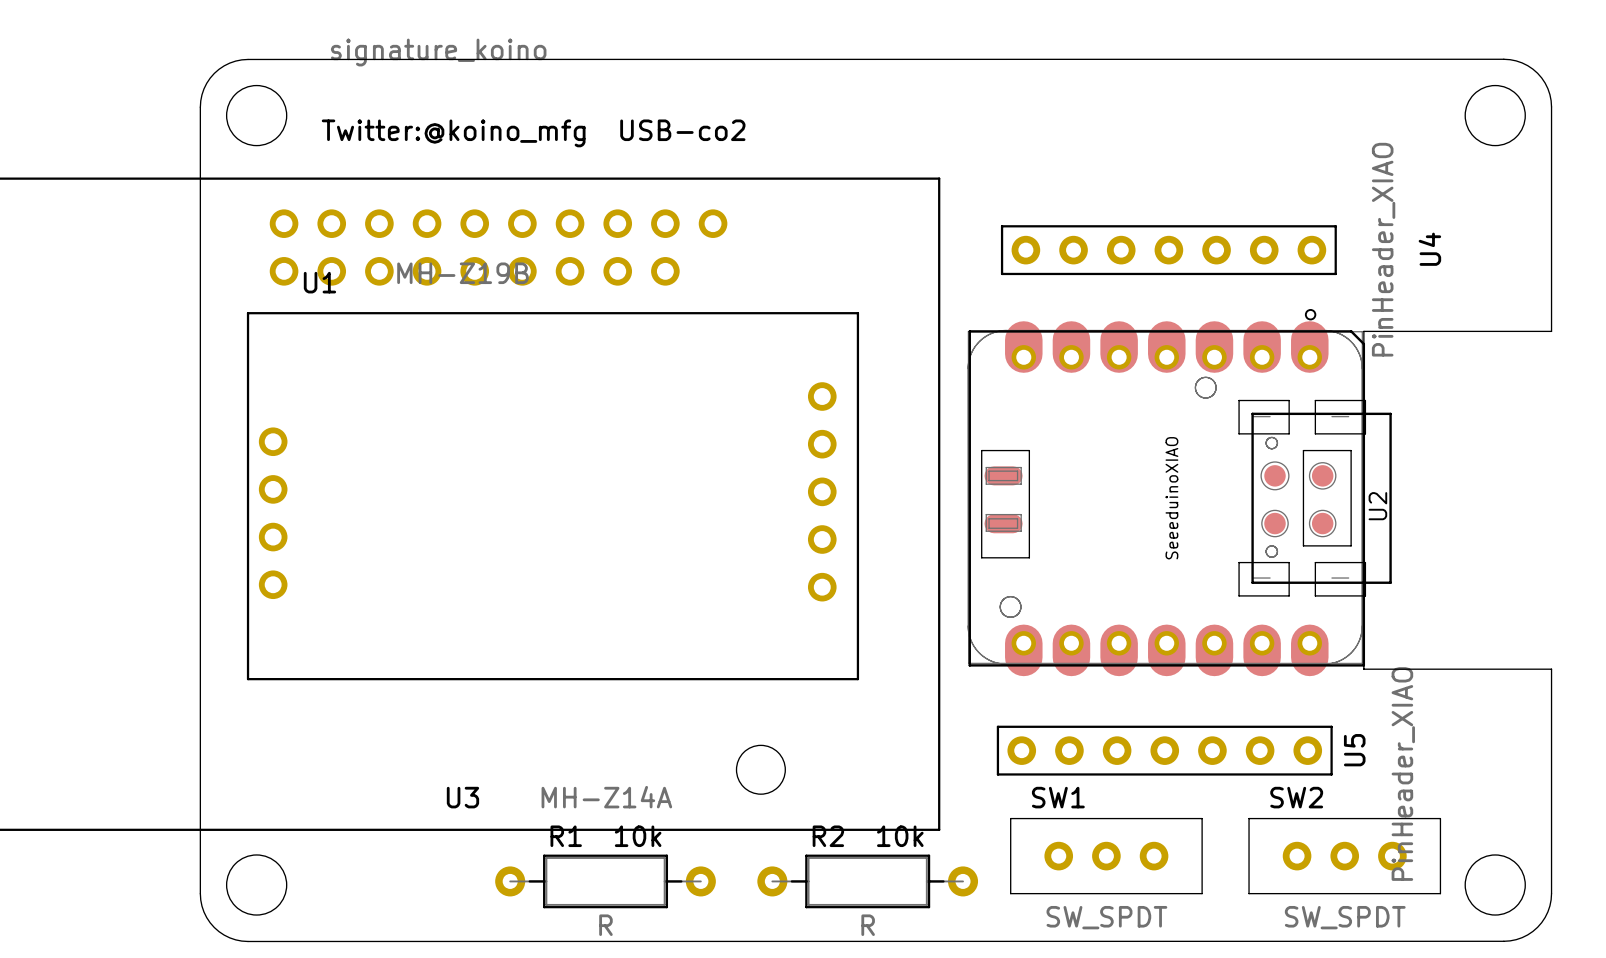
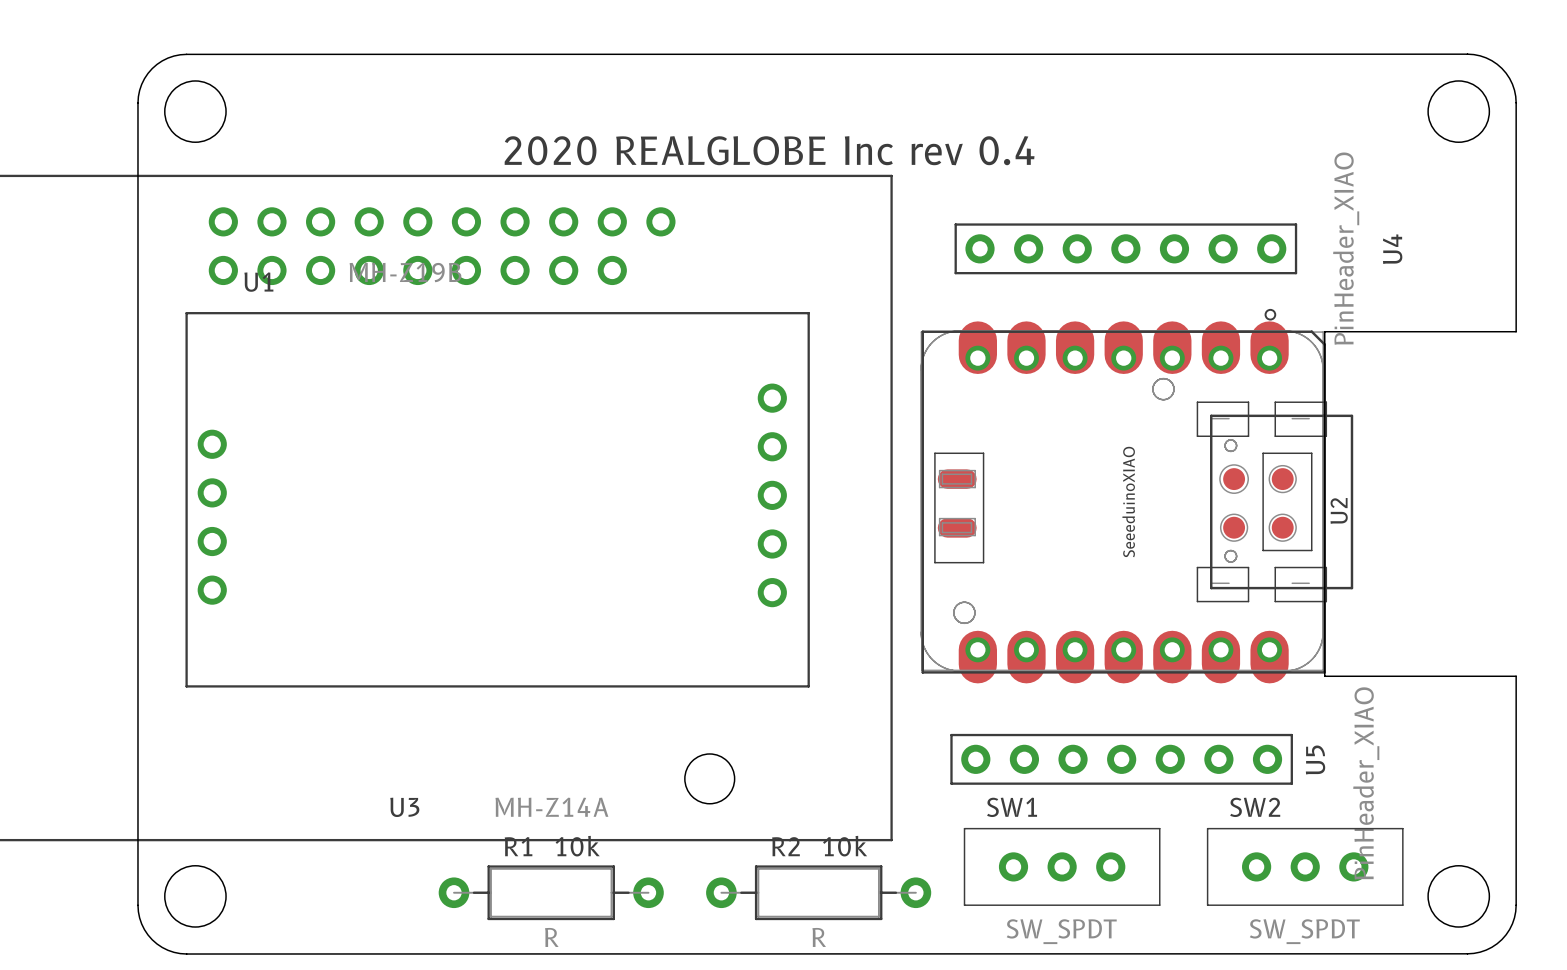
drawing: [321, 38, 746, 148] -> none
text: none -> 2020 REALGLOBE Inc rev 0.4 (769, 150)

